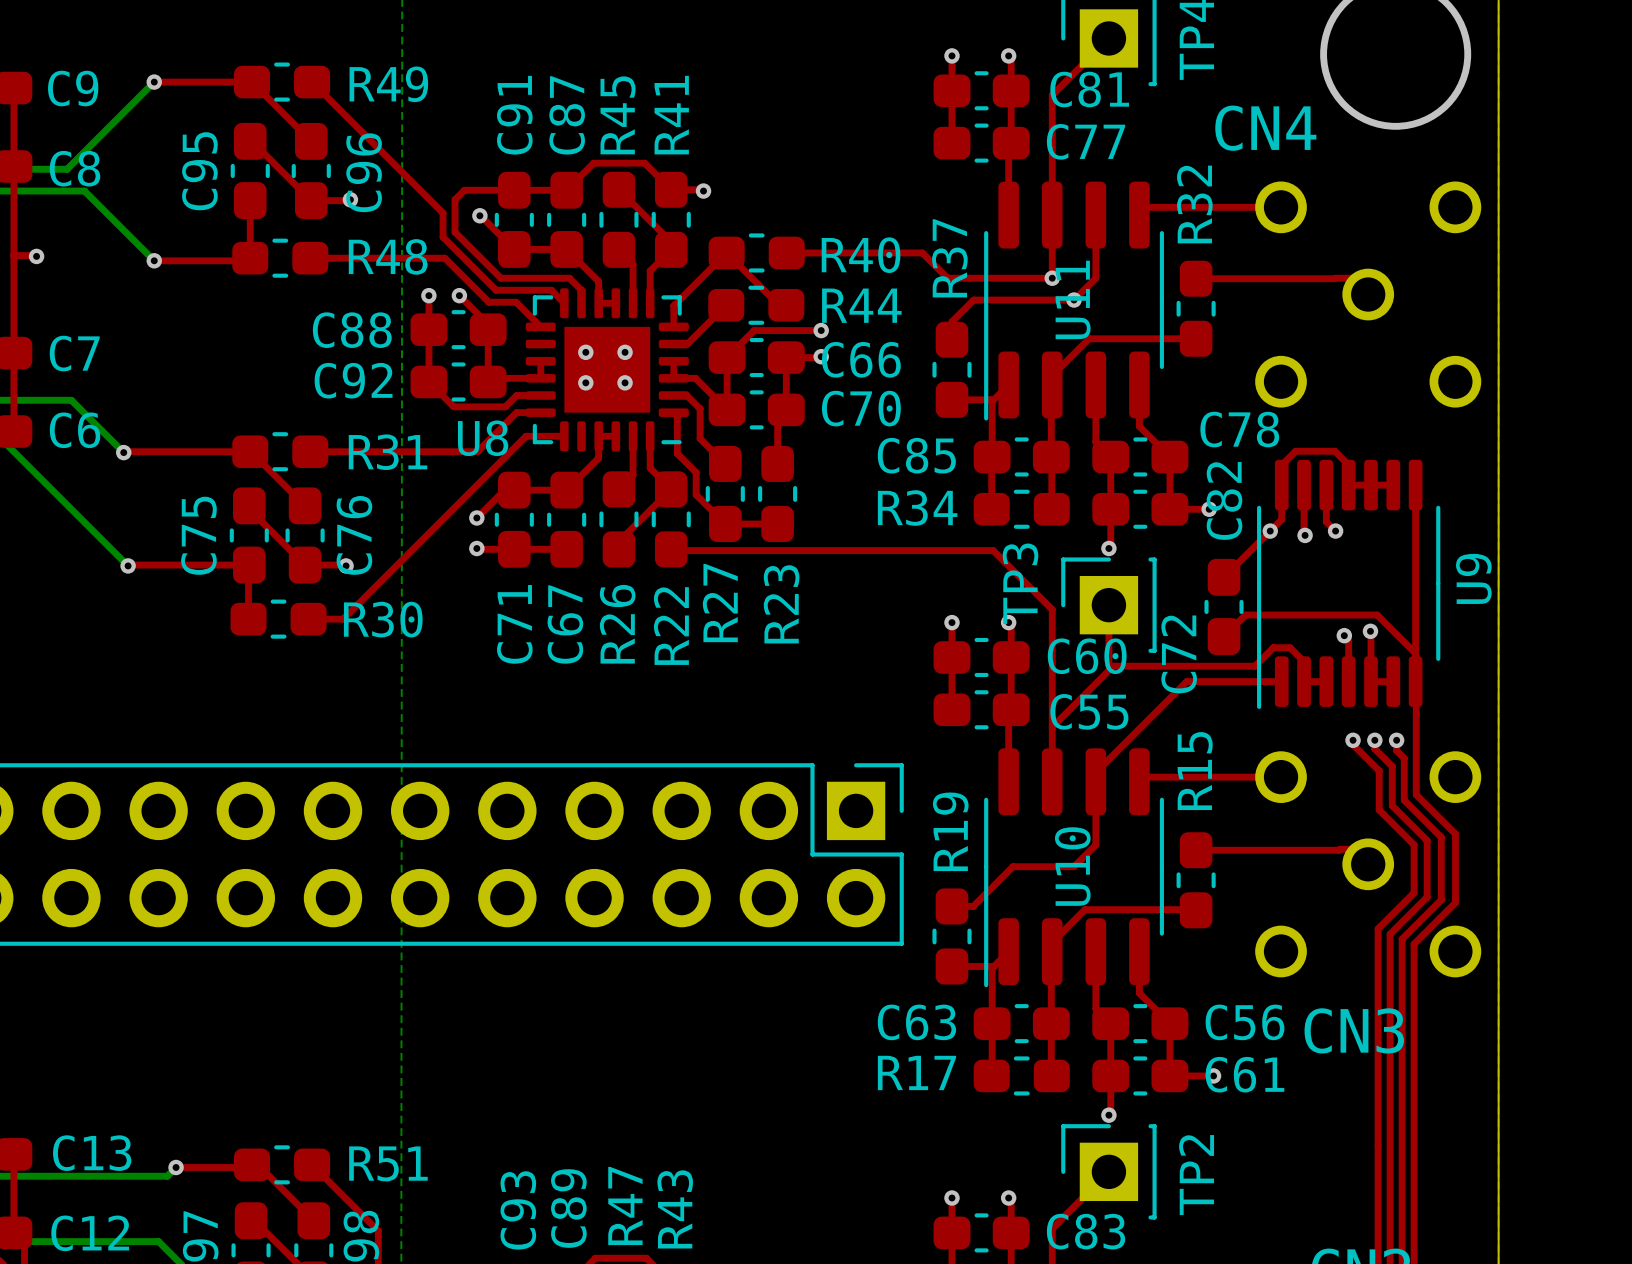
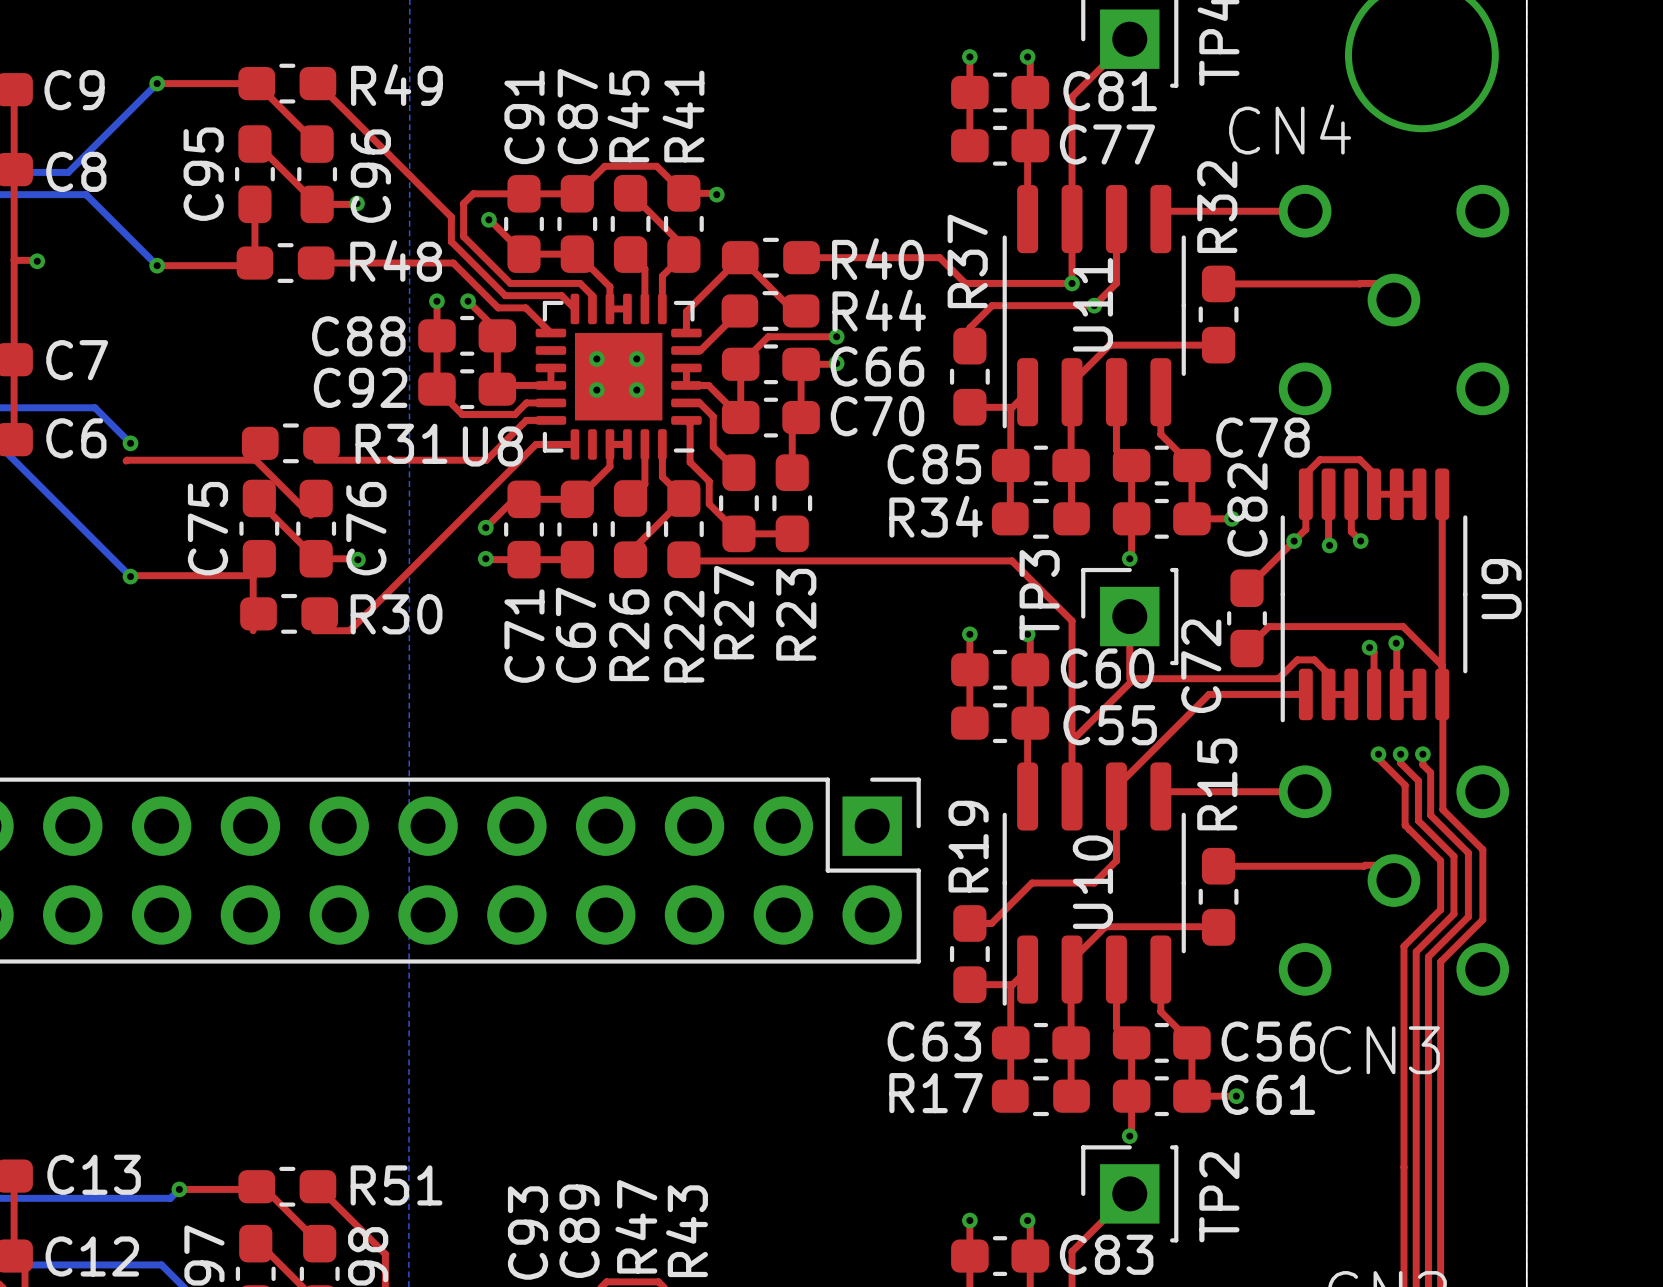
bottom track: (71, 400) (123, 452) -> (72, 407) (94, 407) (130, 443)
R31 position: (280, 451) -> (290, 443)
via position: (123, 452) -> (130, 443)
top track: (249, 505) (249, 509) (305, 565) (346, 565) -> (259, 498) (259, 501) (316, 558) (357, 559)
C75 position: (249, 535) -> (259, 528)
C76 position: (305, 535) -> (316, 528)
via position: (346, 565) -> (357, 559)
R30 position: (278, 619) -> (289, 613)

